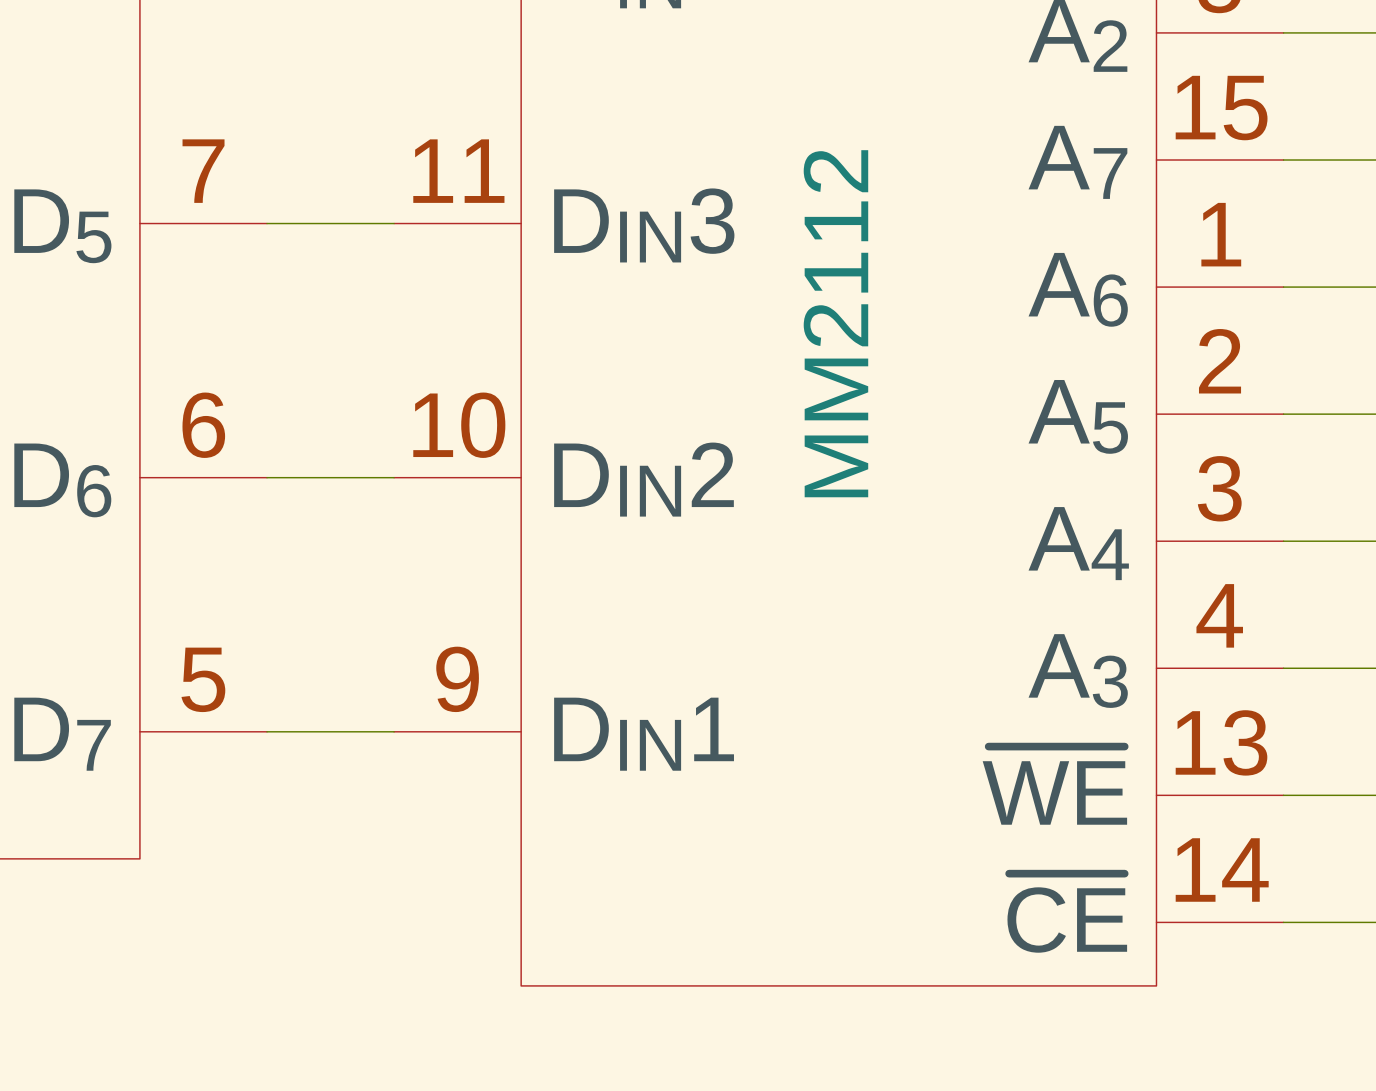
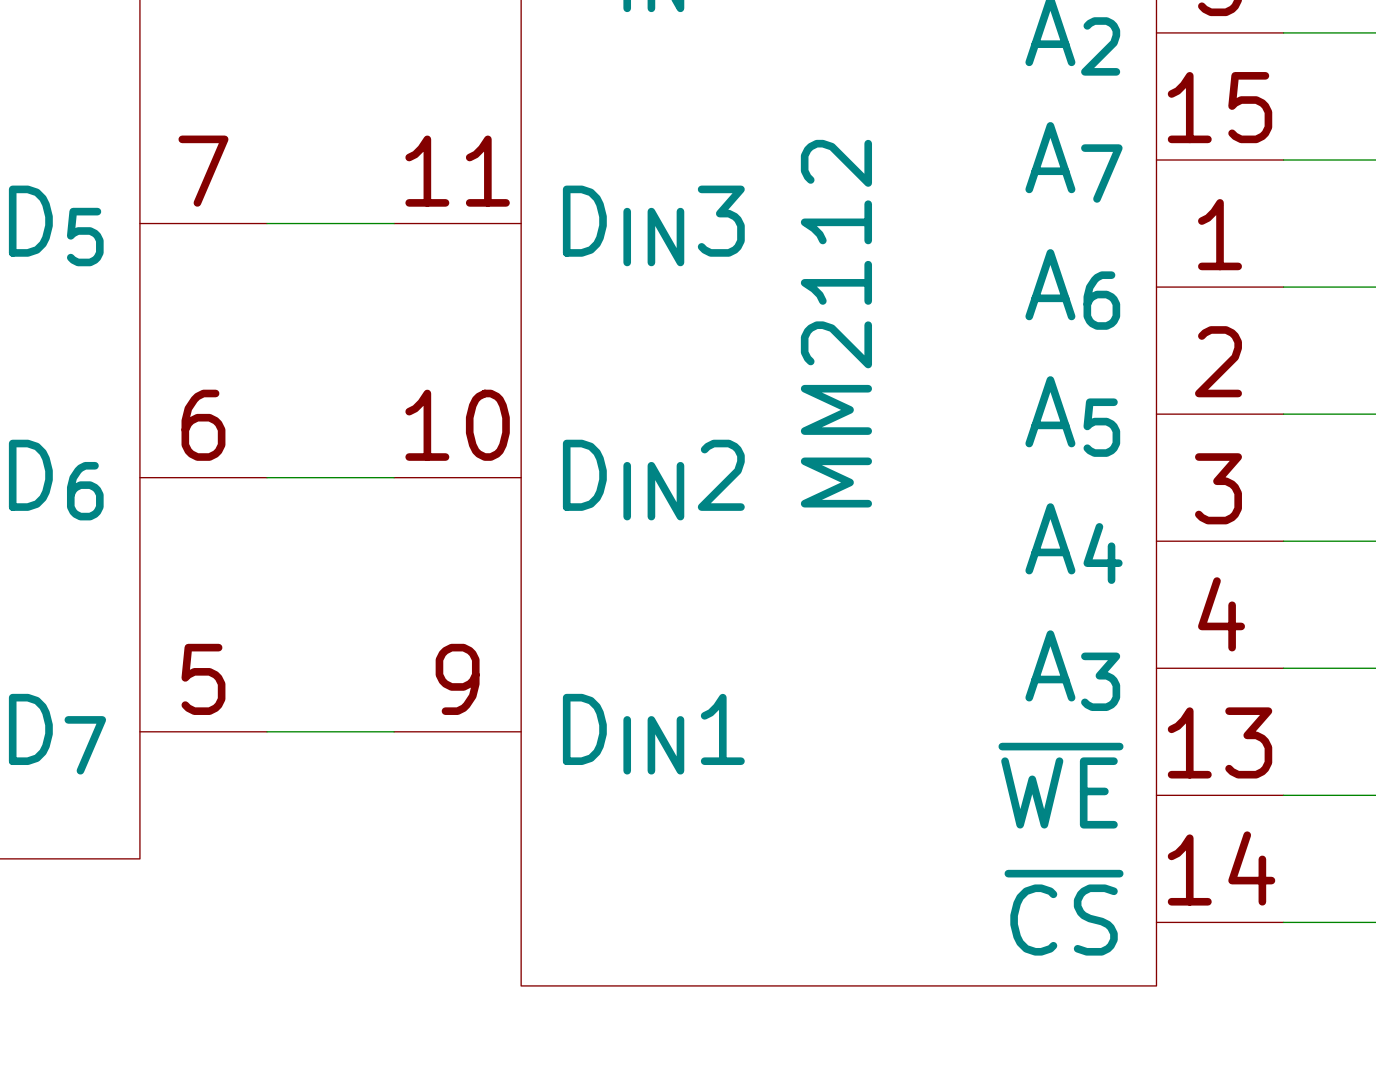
part pin name: ~{CE} (1067, 913) -> ~{CS} (1064, 912)

